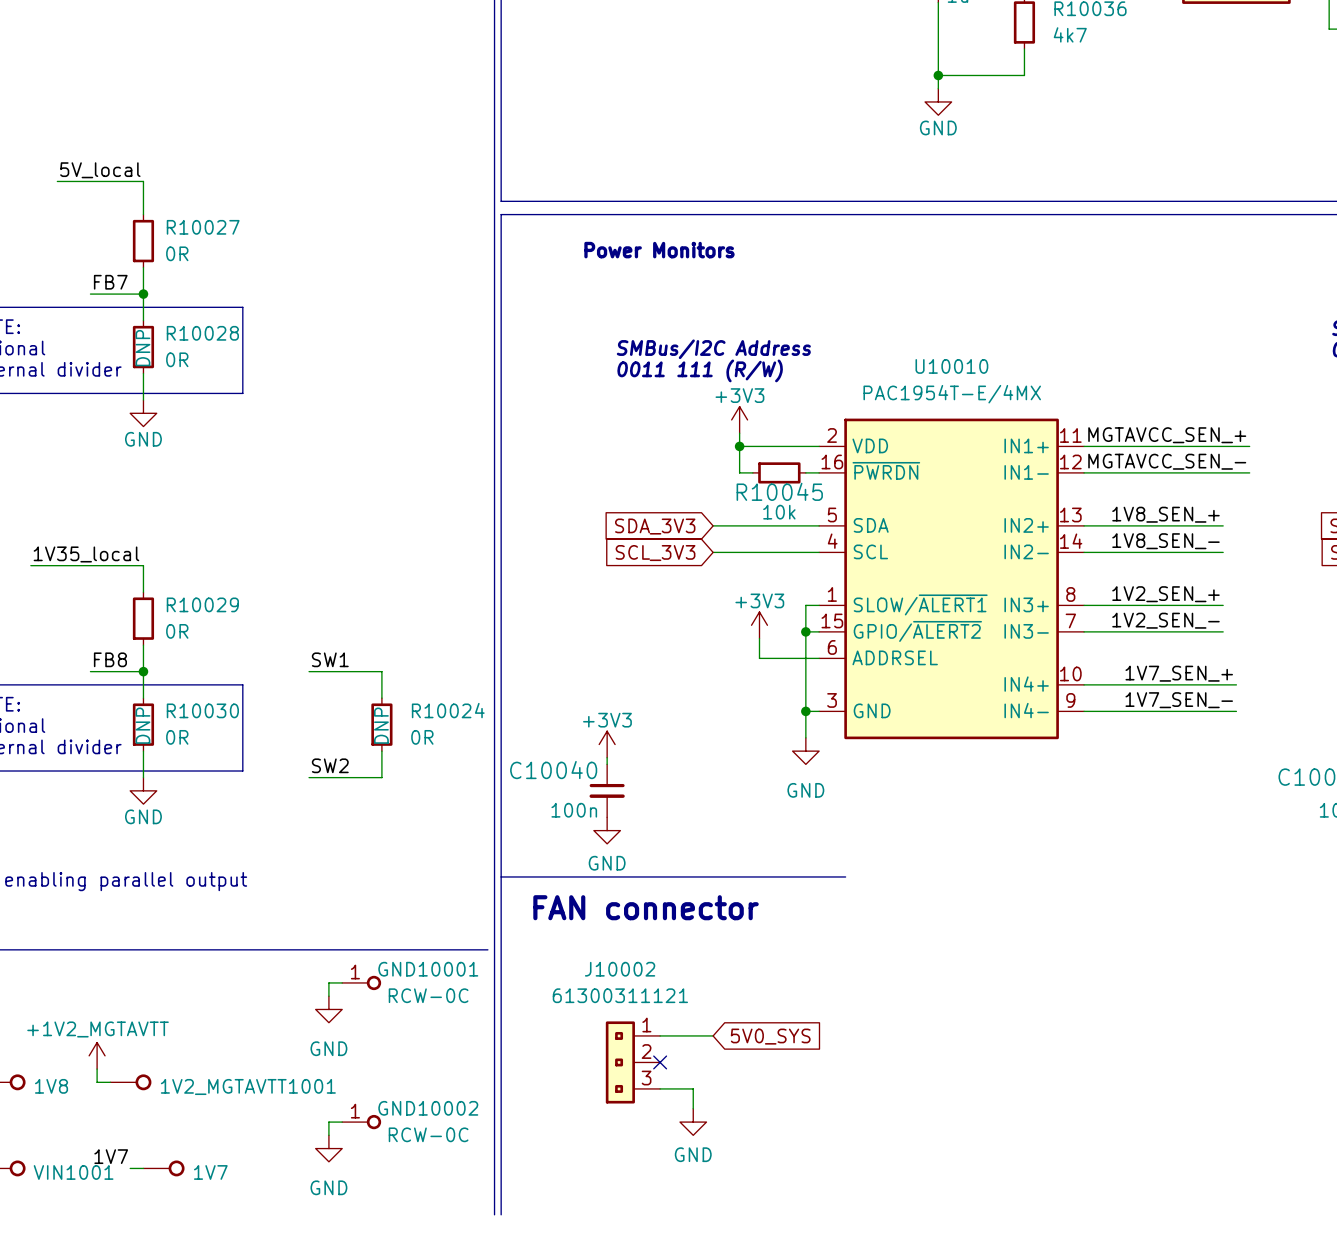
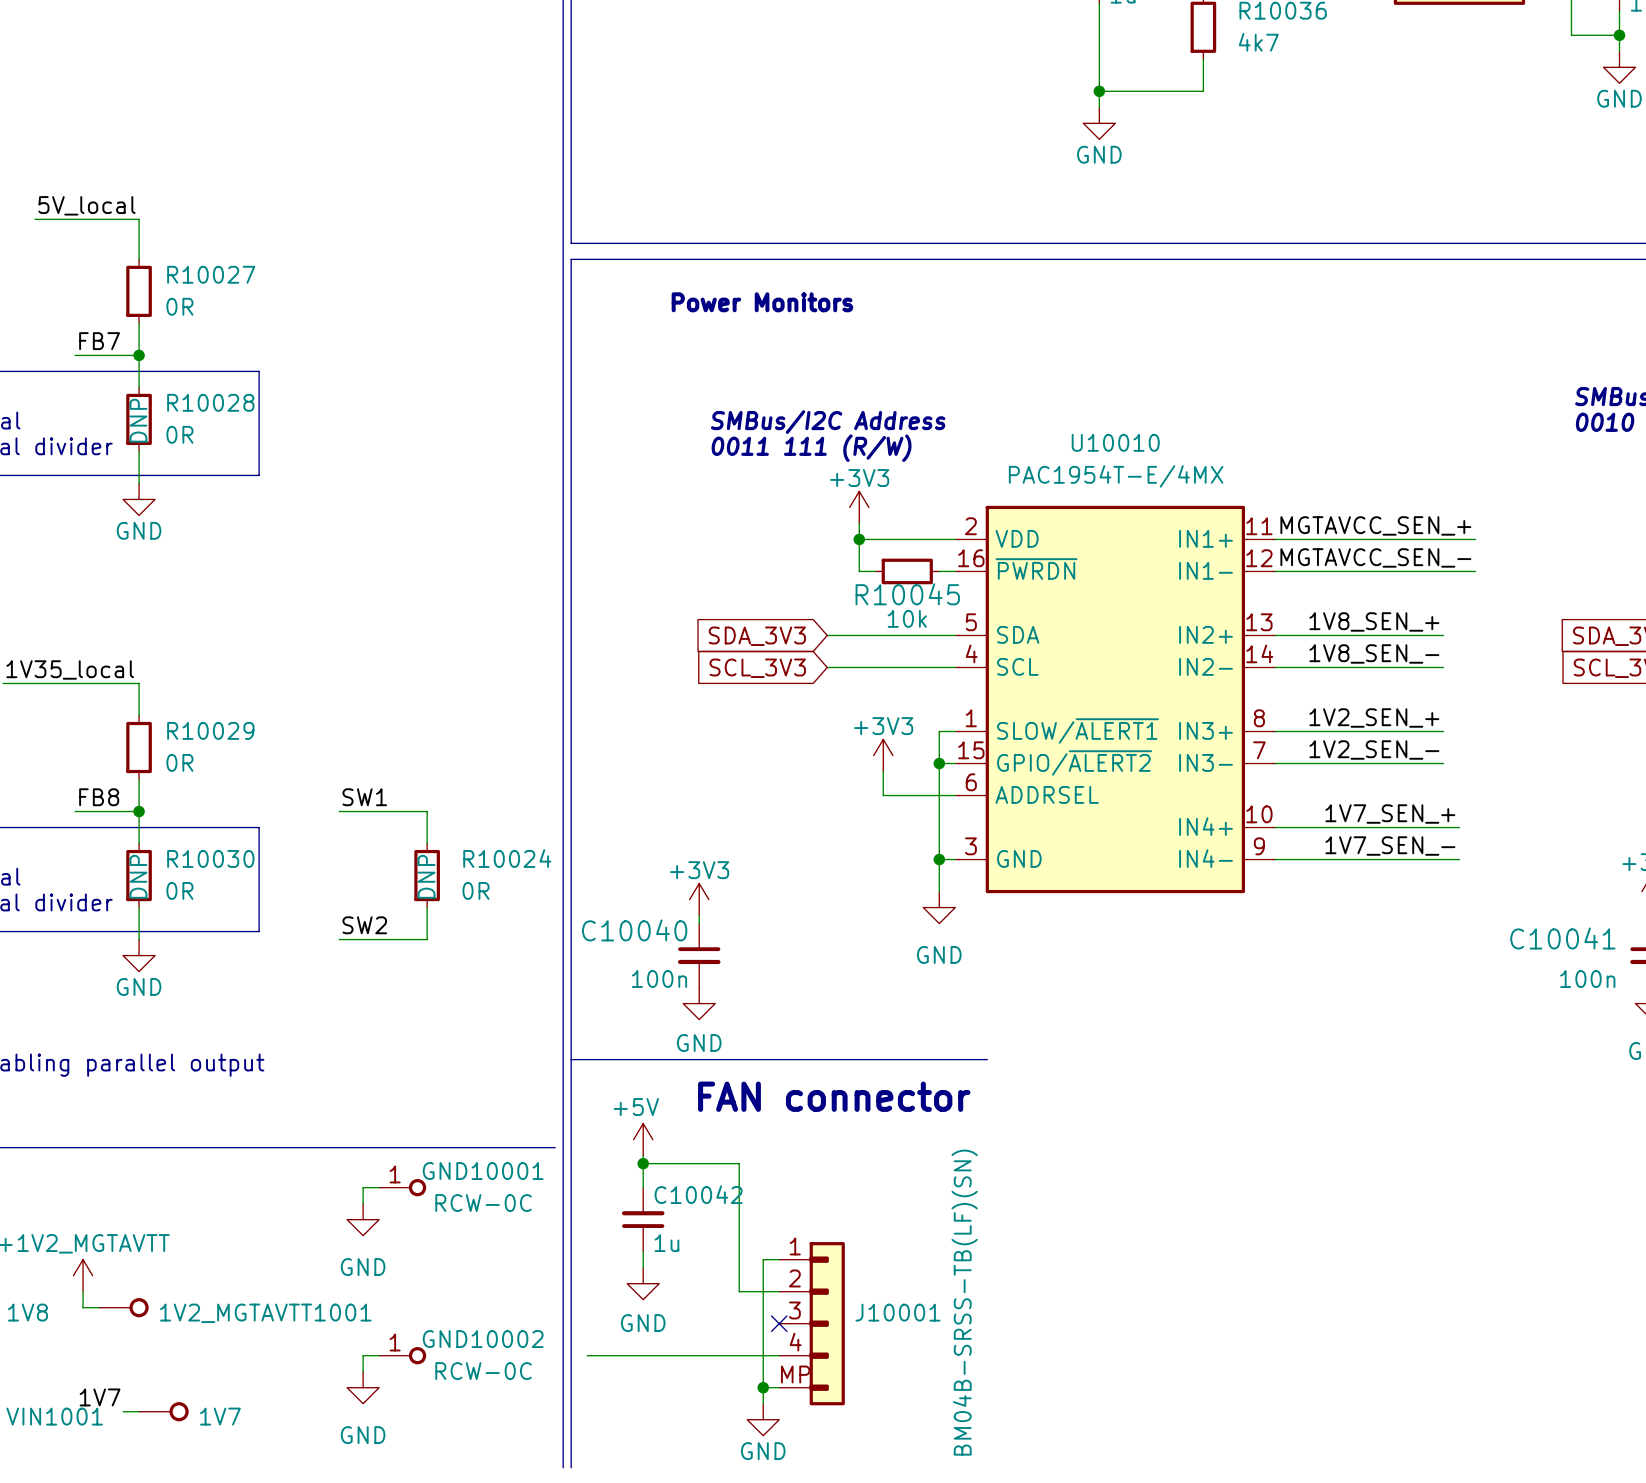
text position: FAN connector (646, 907) -> FAN connector (834, 1096)
power symbol: none -> +5V (643, 1139)
wire: none -> (643, 1155) (643, 1187)
wire: none -> (643, 1163) (739, 1163) (739, 1291) (779, 1291)
junction: none -> (643, 1163)
C10042: none -> (643, 1219)
wire: none -> (643, 1251) (643, 1267)
wire: (660, 1035) (713, 1035) -> none
global label: 5V0_SYS (770, 1036) -> none
wire: none -> (779, 1259) (763, 1259) (763, 1403)
power symbol: none -> GND (643, 1283)
J10002: (632, 1062) -> none
no-connect mark position: (660, 1062) -> (779, 1323)
wire: (660, 1088) (693, 1088) (693, 1108) -> none
J10001: none -> (812, 1323)
wire: none -> (587, 1355) (779, 1355)
power symbol position: GND (693, 1122) -> GND (763, 1419)
wire: none -> (763, 1387) (779, 1387)
junction: none -> (763, 1387)
power symbol text position: GND (693, 1154) -> GND (763, 1451)

